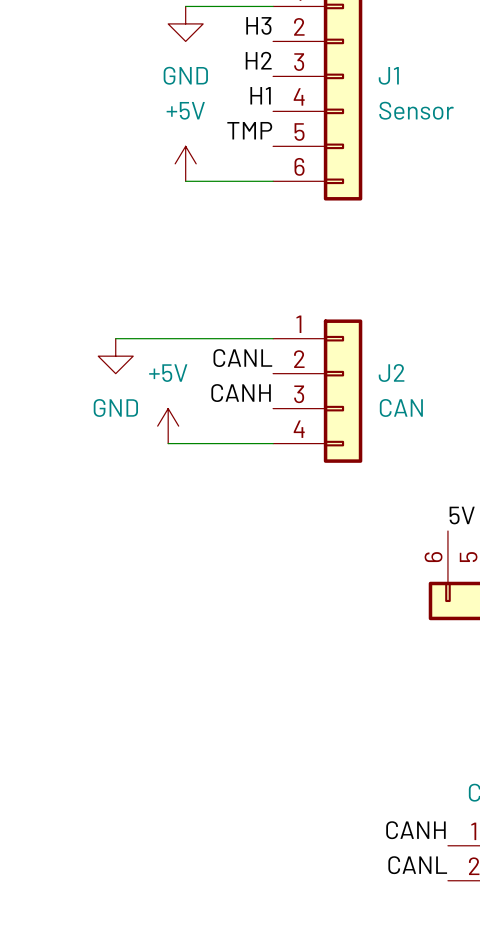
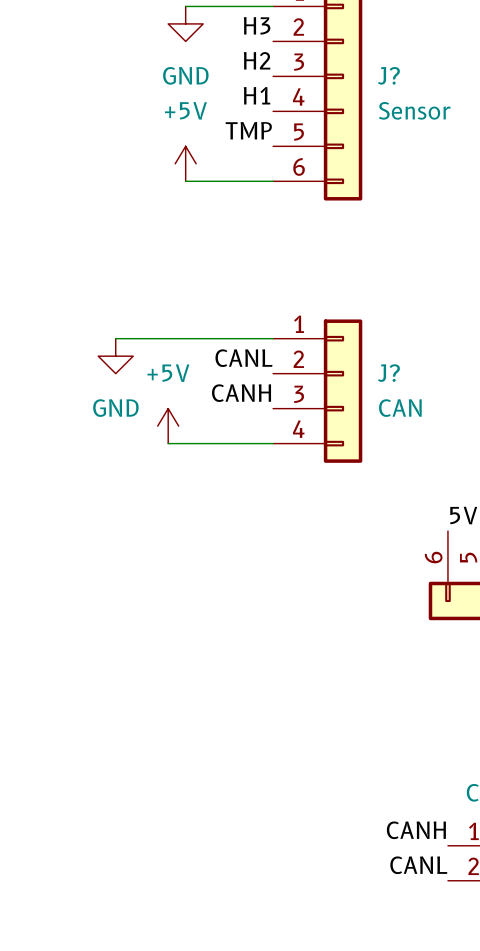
J1 name: J1 (388, 75) -> J? (388, 75)
J2 name: J2 (391, 373) -> J? (388, 373)

